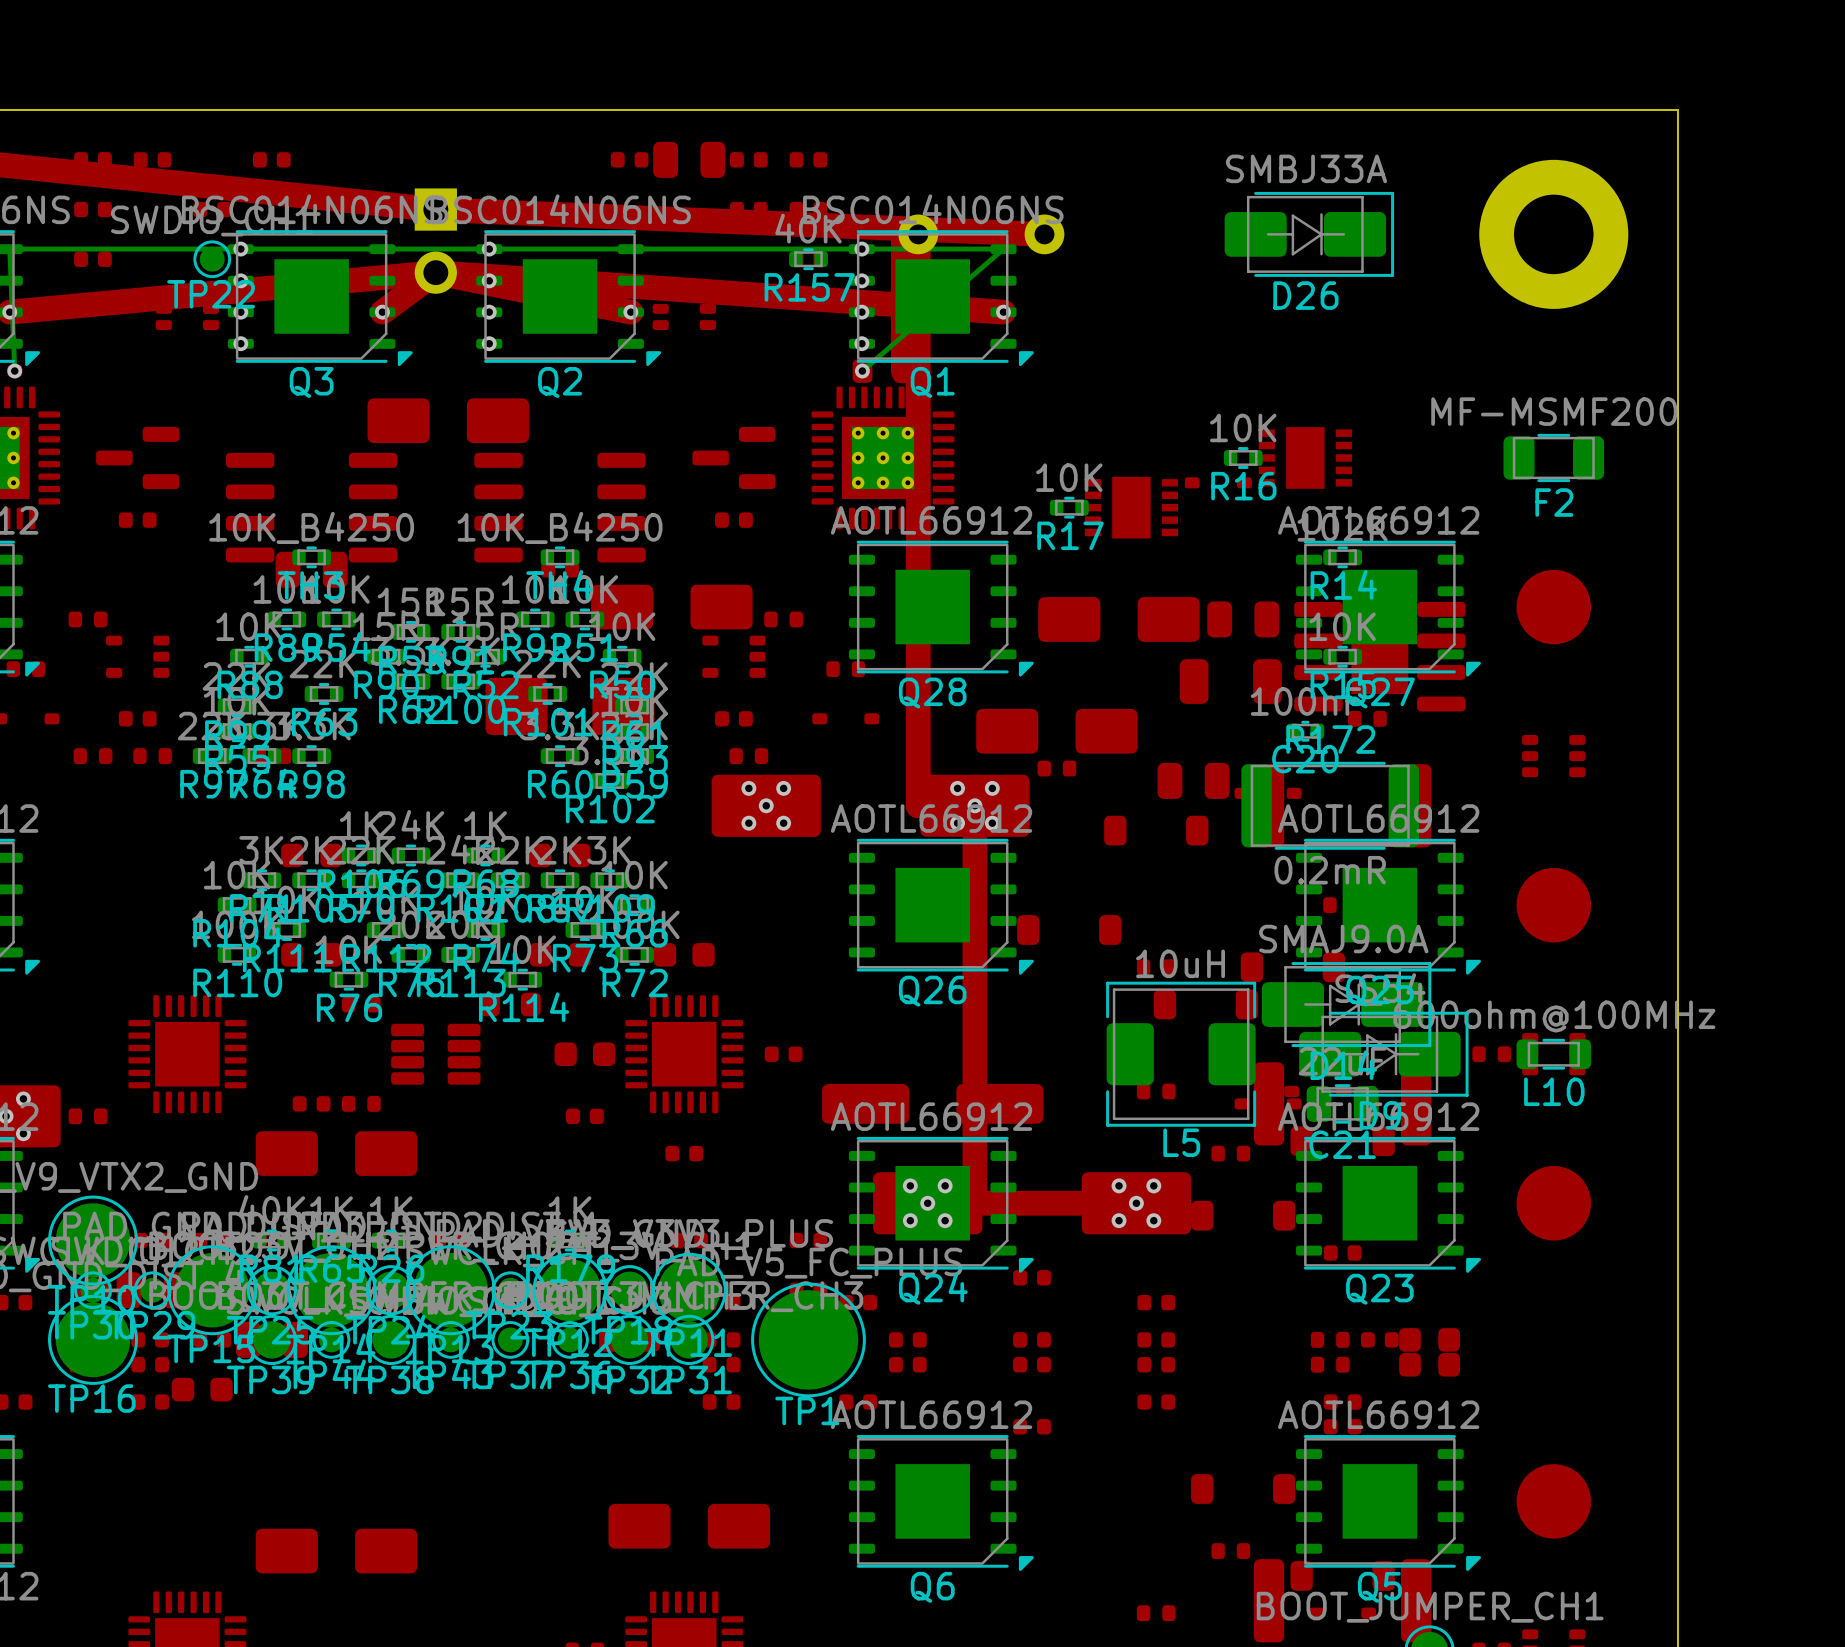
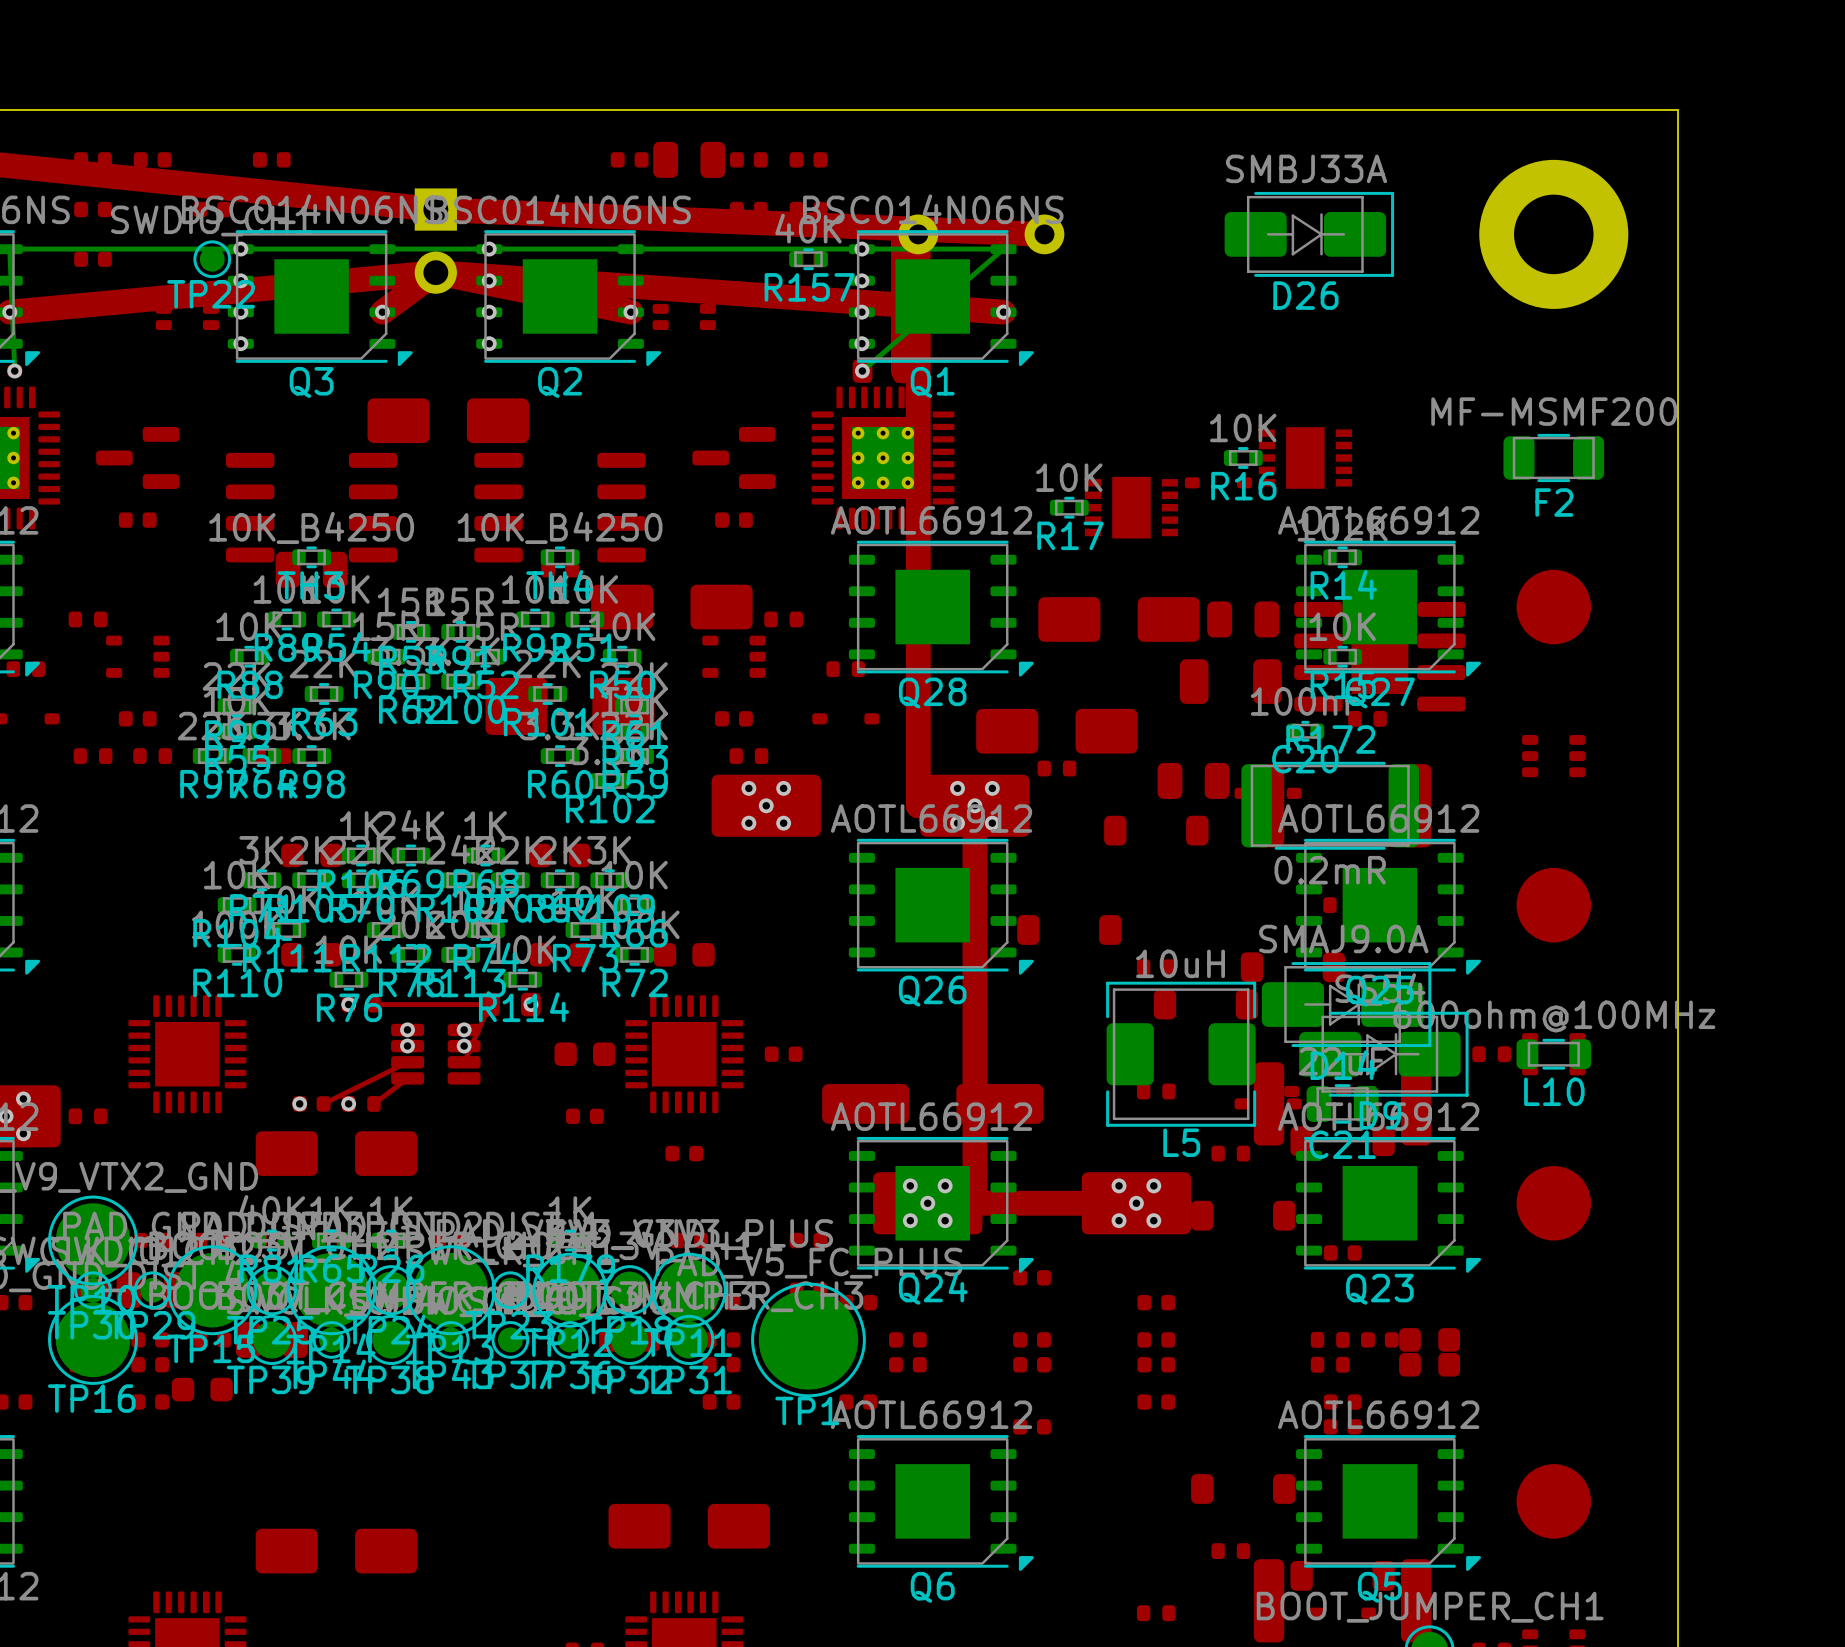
via: none -> (348, 1004)
top track: none -> (373, 1004) (489, 1004) (464, 1062)
via: none -> (530, 1004)
via: none -> (407, 1029)
via: none -> (464, 1029)
via: none -> (407, 1046)
via: none -> (464, 1046)
top track: none -> (407, 1062) (323, 1103)
top track: none -> (407, 1078) (373, 1103)
via: none -> (299, 1103)
via: none -> (348, 1103)

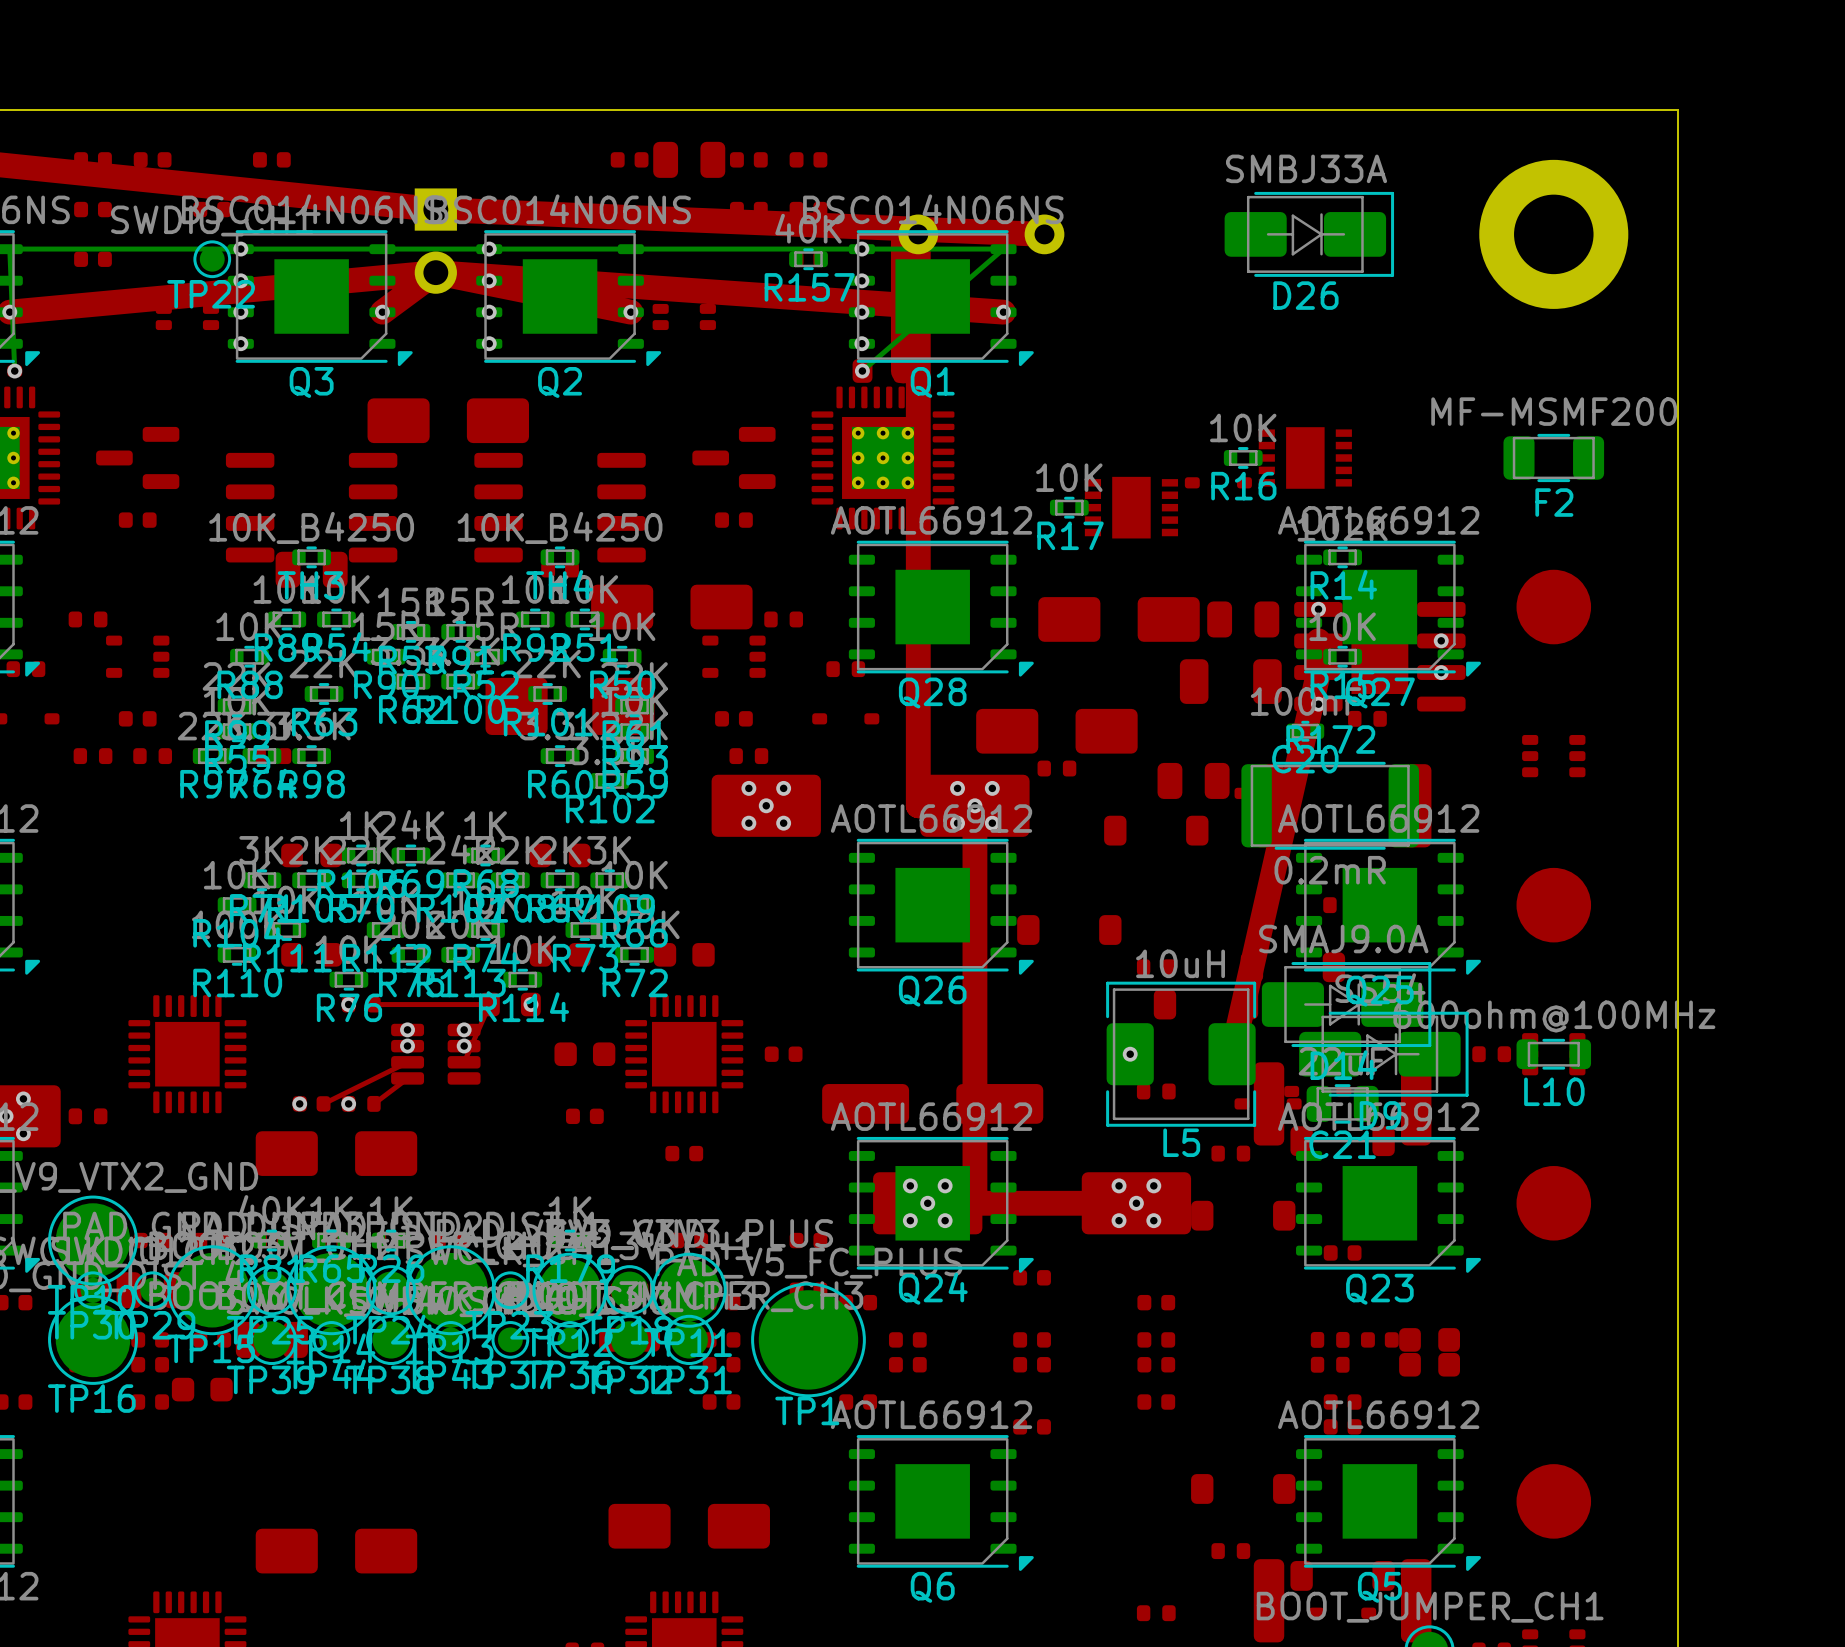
via: none -> (1318, 609)
top track: none -> (1318, 640) (1318, 672) (1232, 1054)
via: none -> (1441, 640)
via: none -> (1441, 672)
via: none -> (1318, 704)
via: none -> (1130, 1054)

